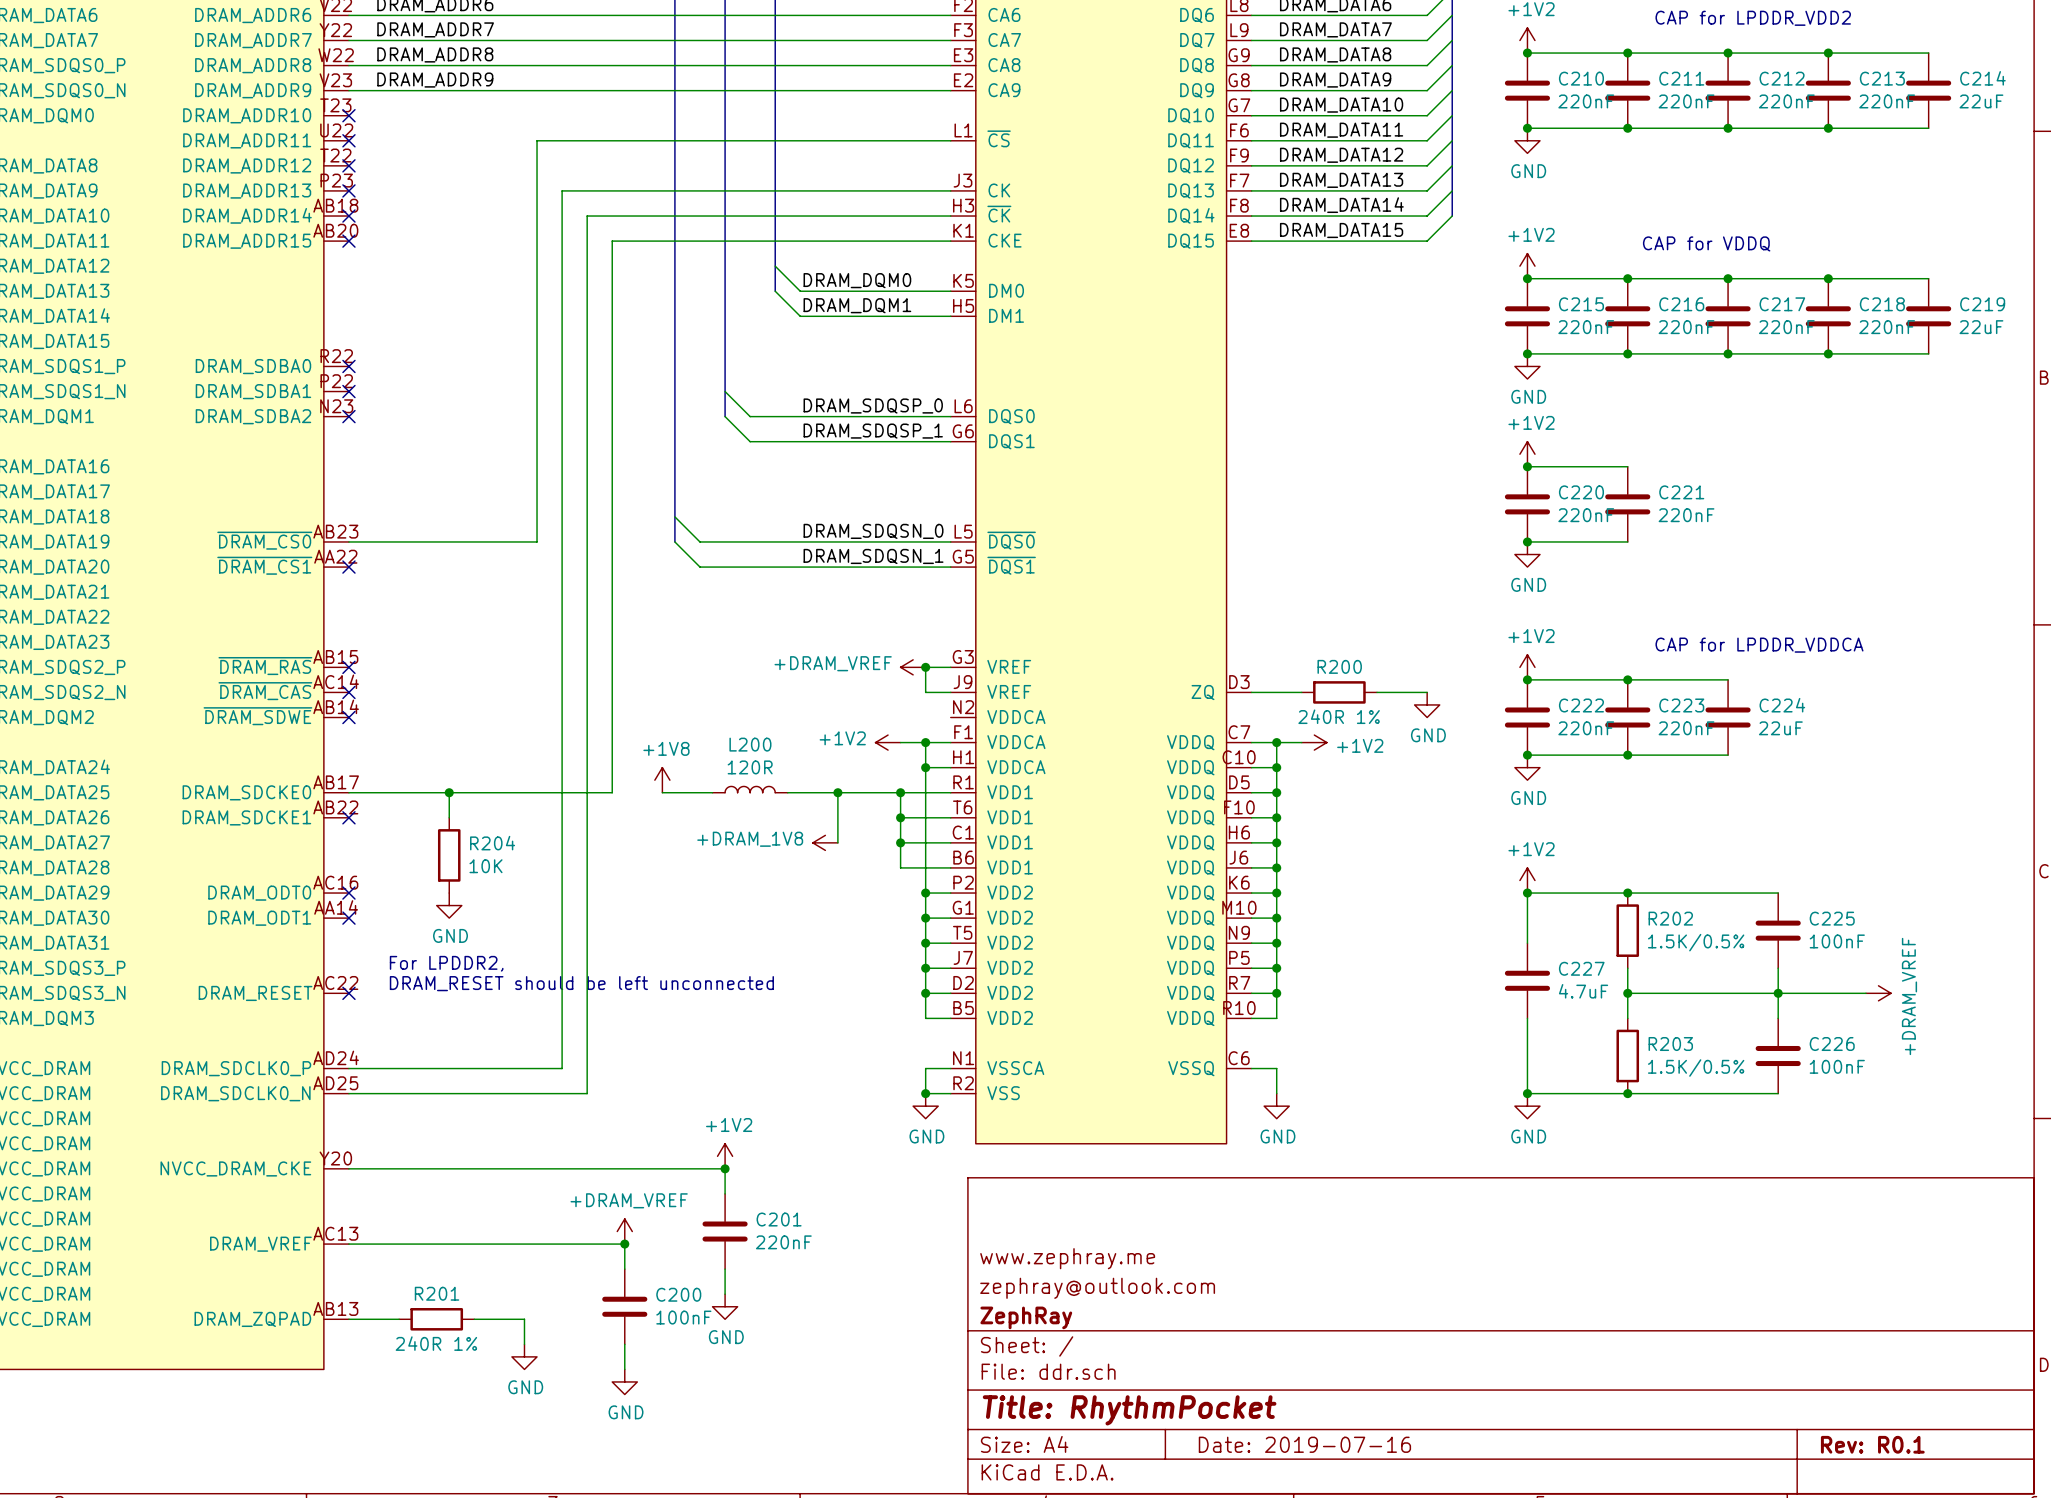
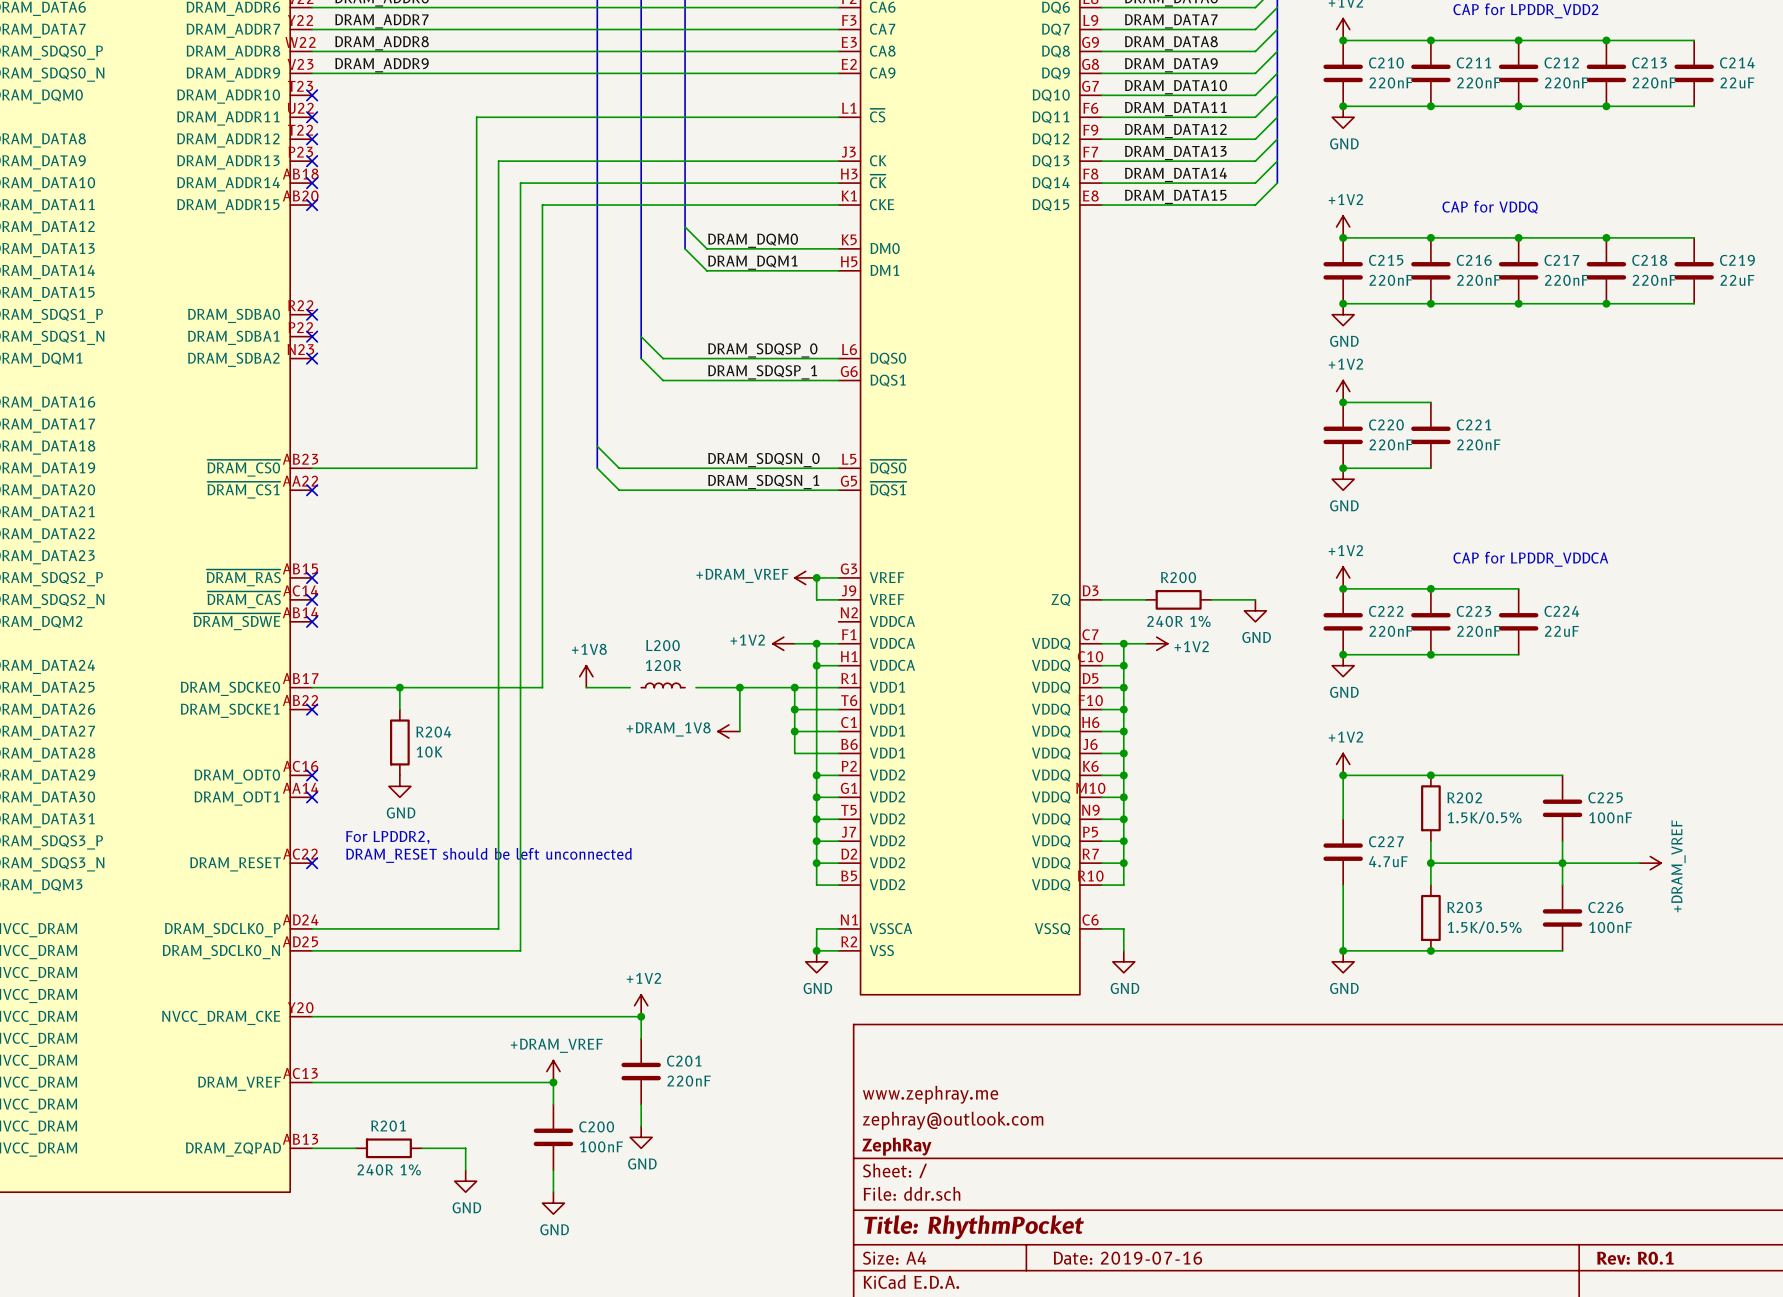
L200 symbol: [712, 786, 788, 793] -> [641, 683, 686, 688]

